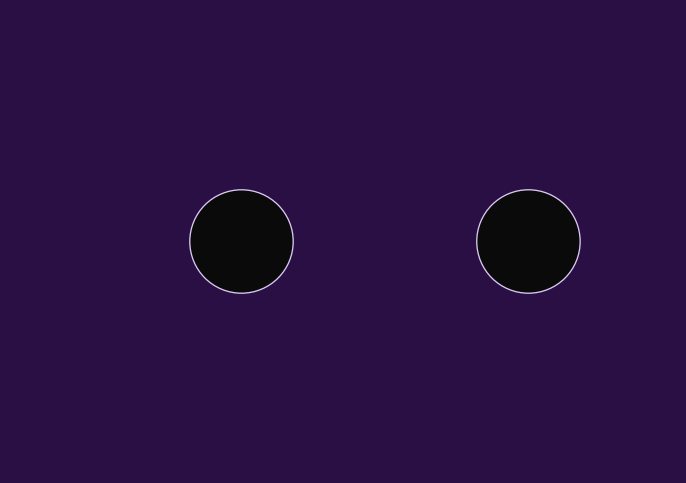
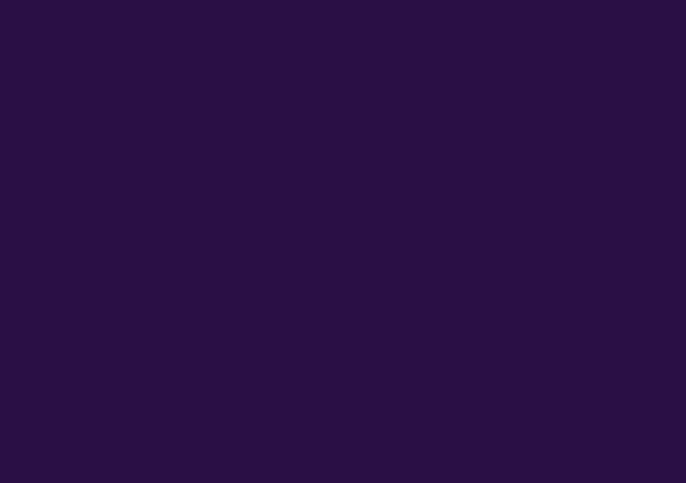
part: (241, 241) -> none
part: (528, 241) -> none

